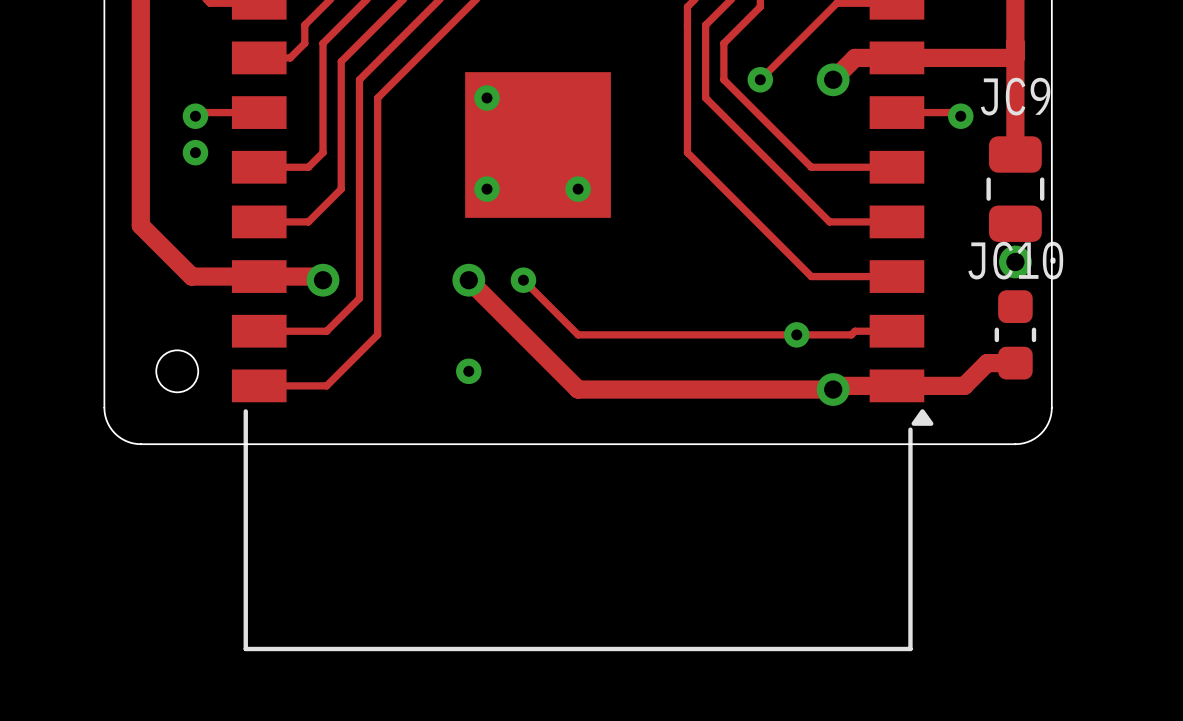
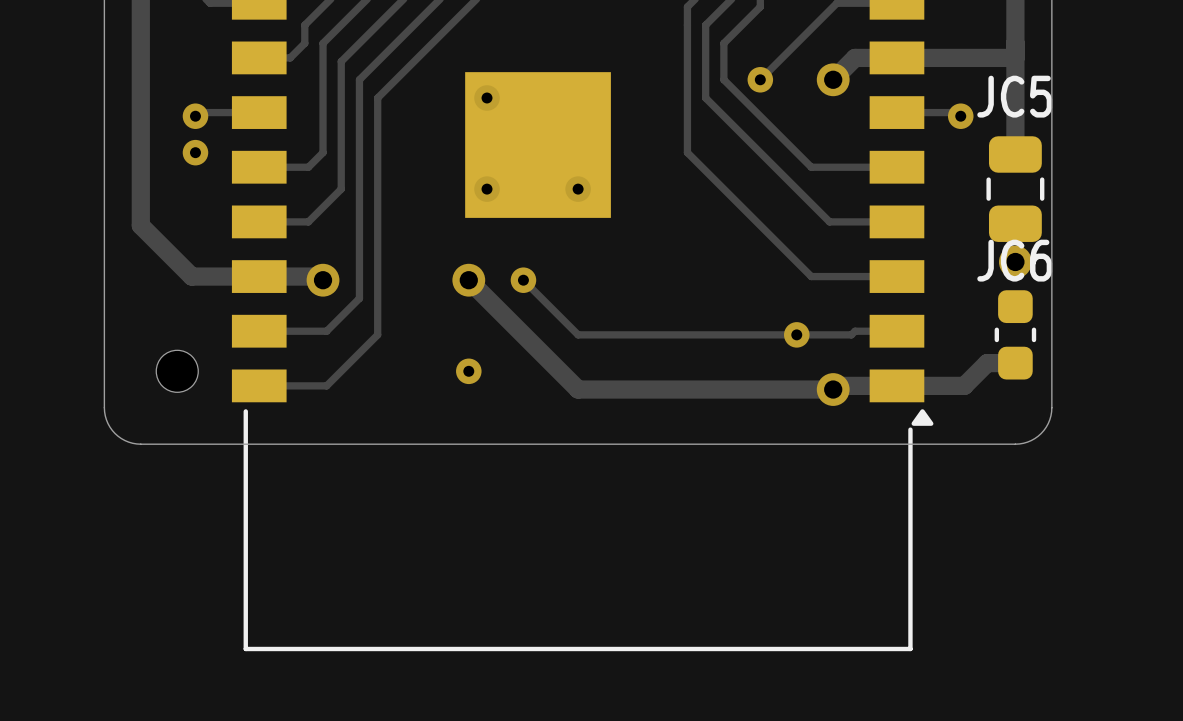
JC9 name: JC9 (1015, 96) -> JC5 (1014, 96)
JC10 name: JC10 (1015, 260) -> JC6 (1014, 260)

